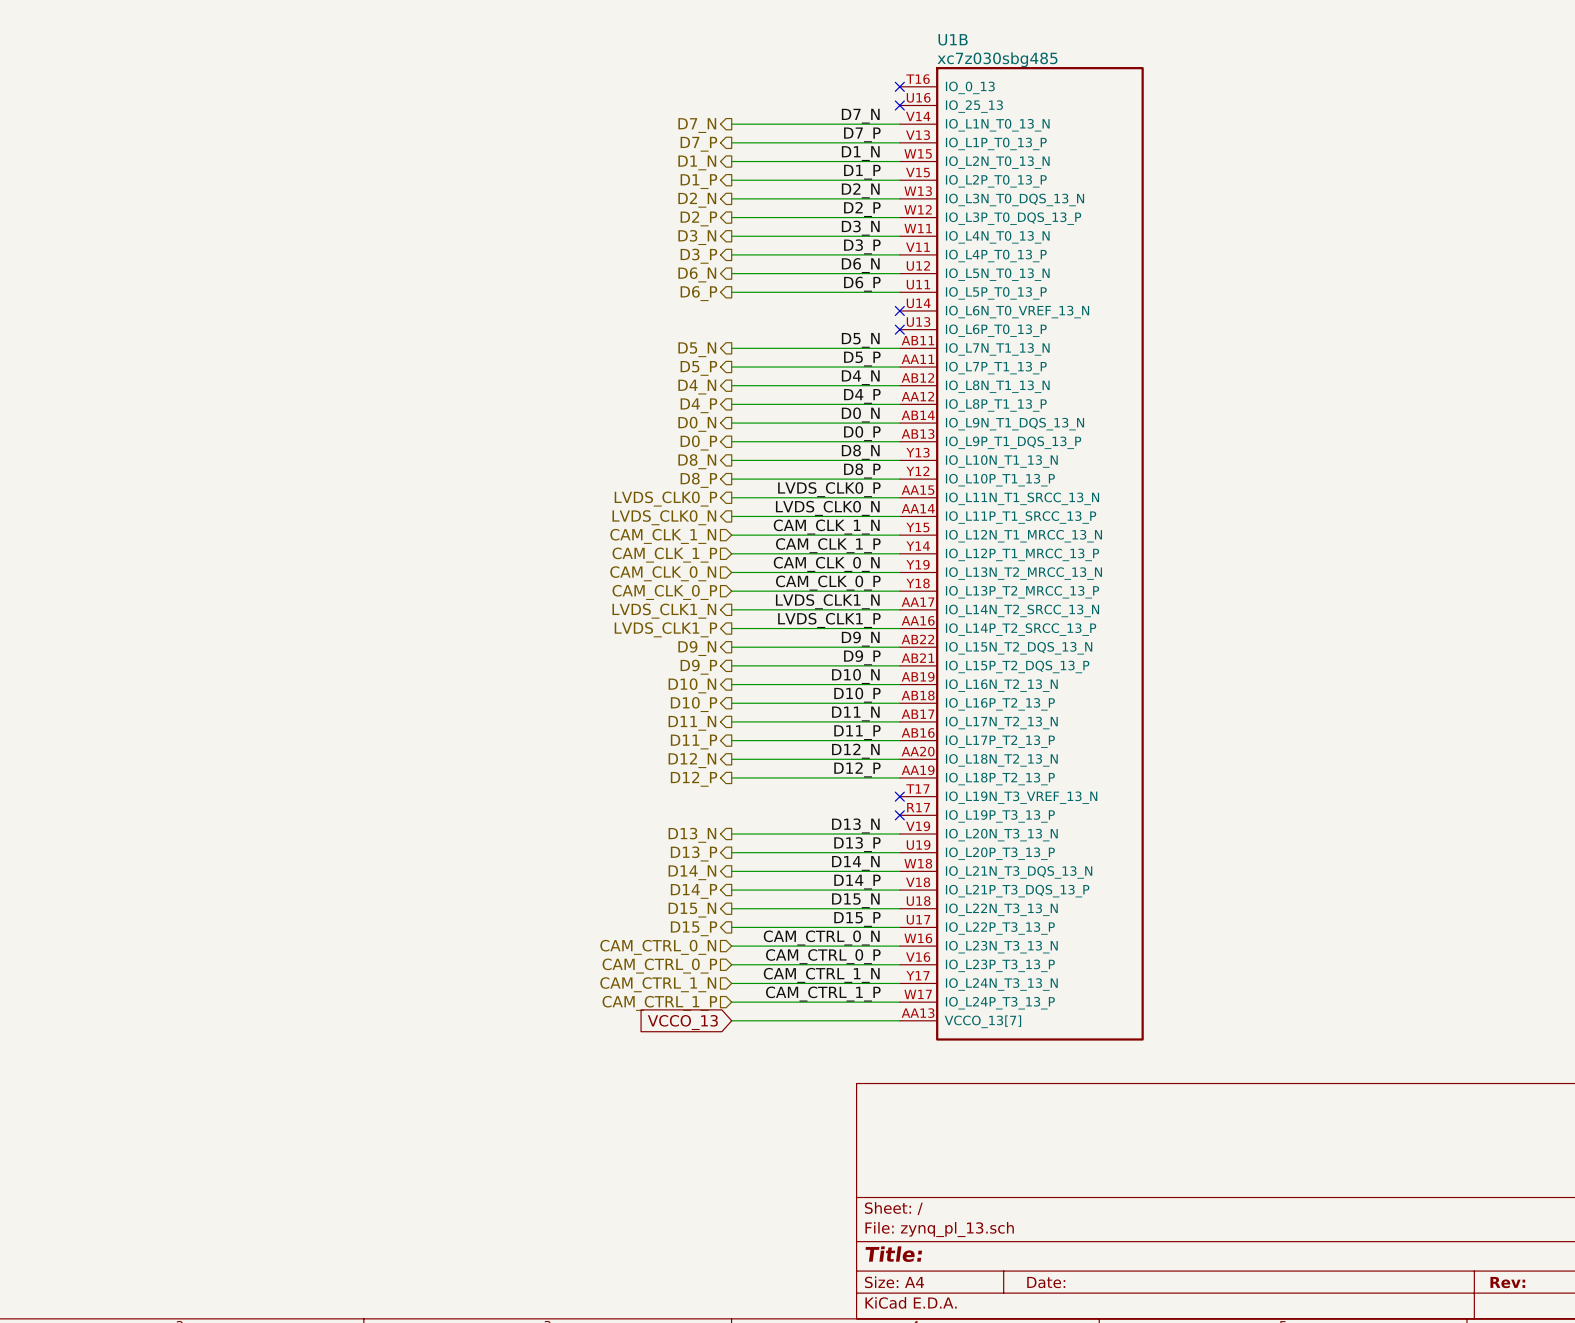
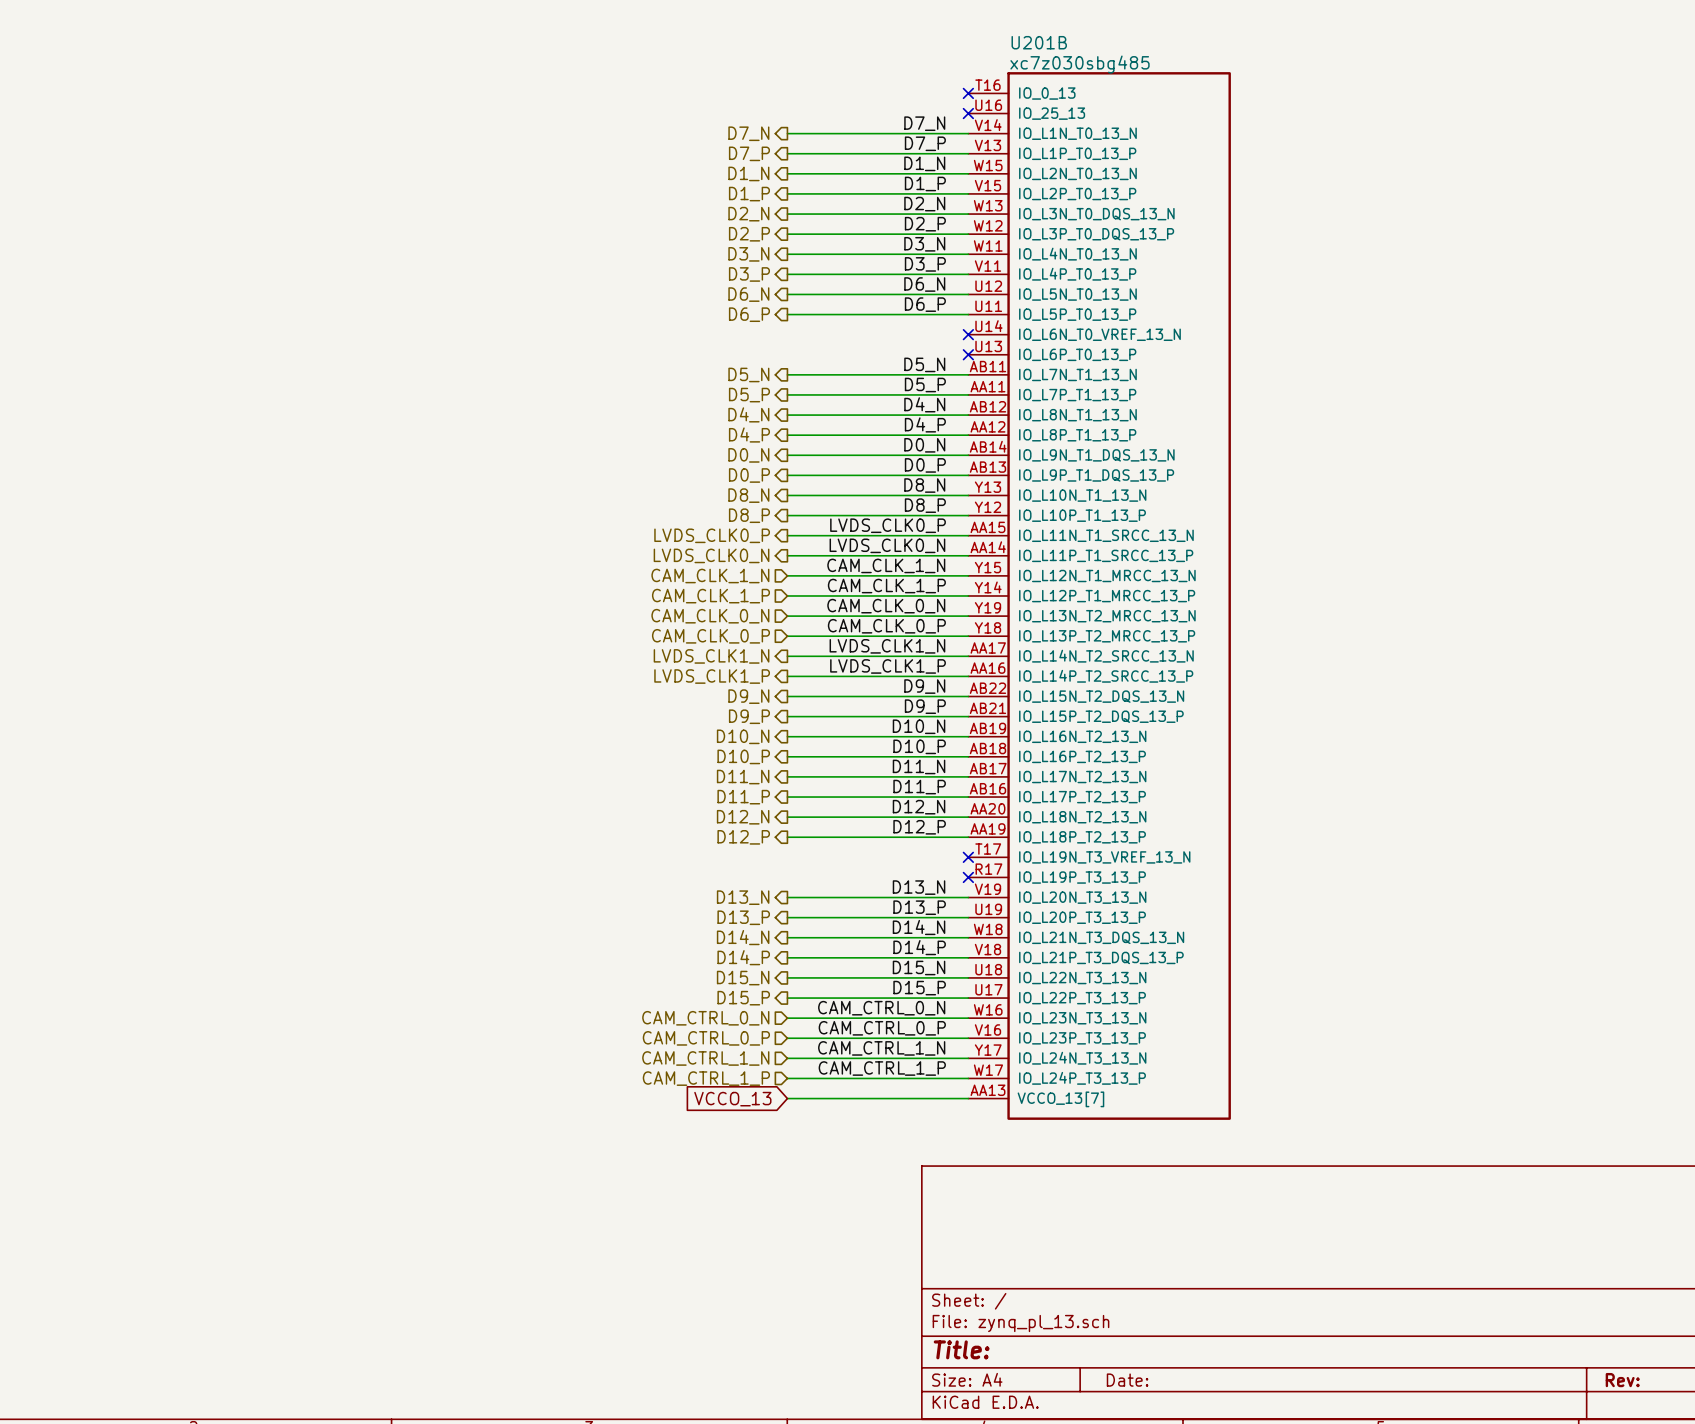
U1B name: U1B (953, 39) -> U201B (1039, 42)

